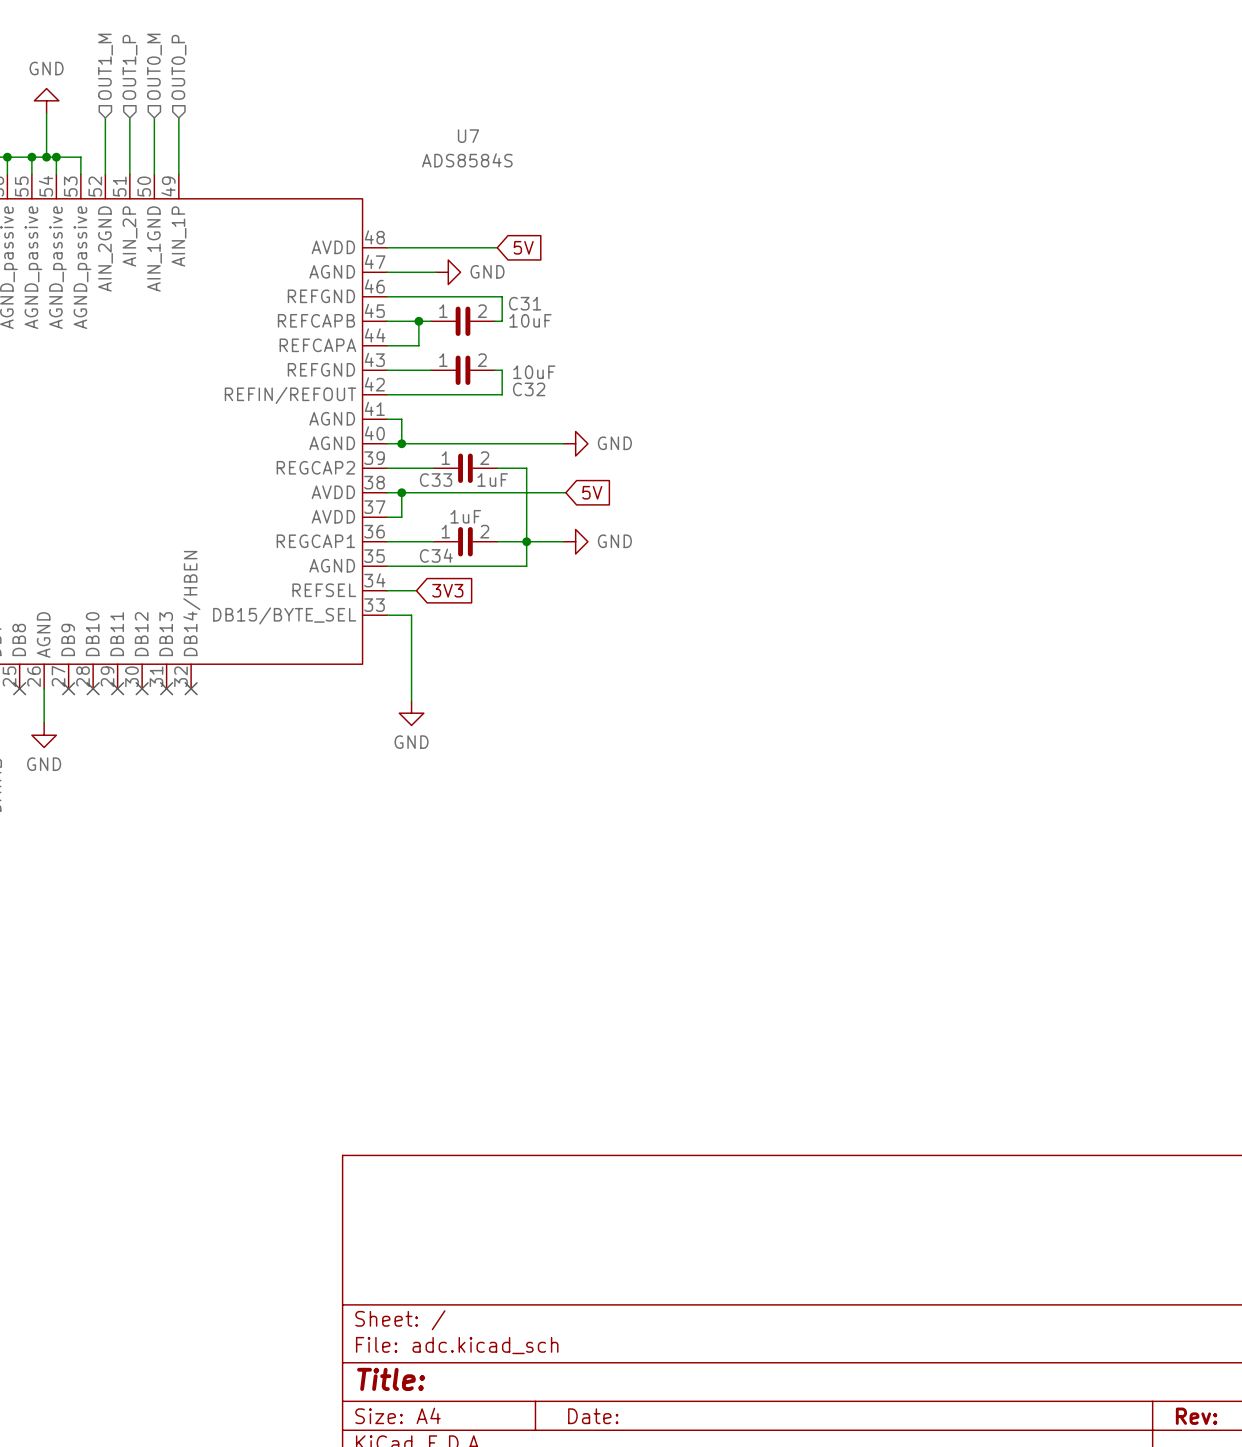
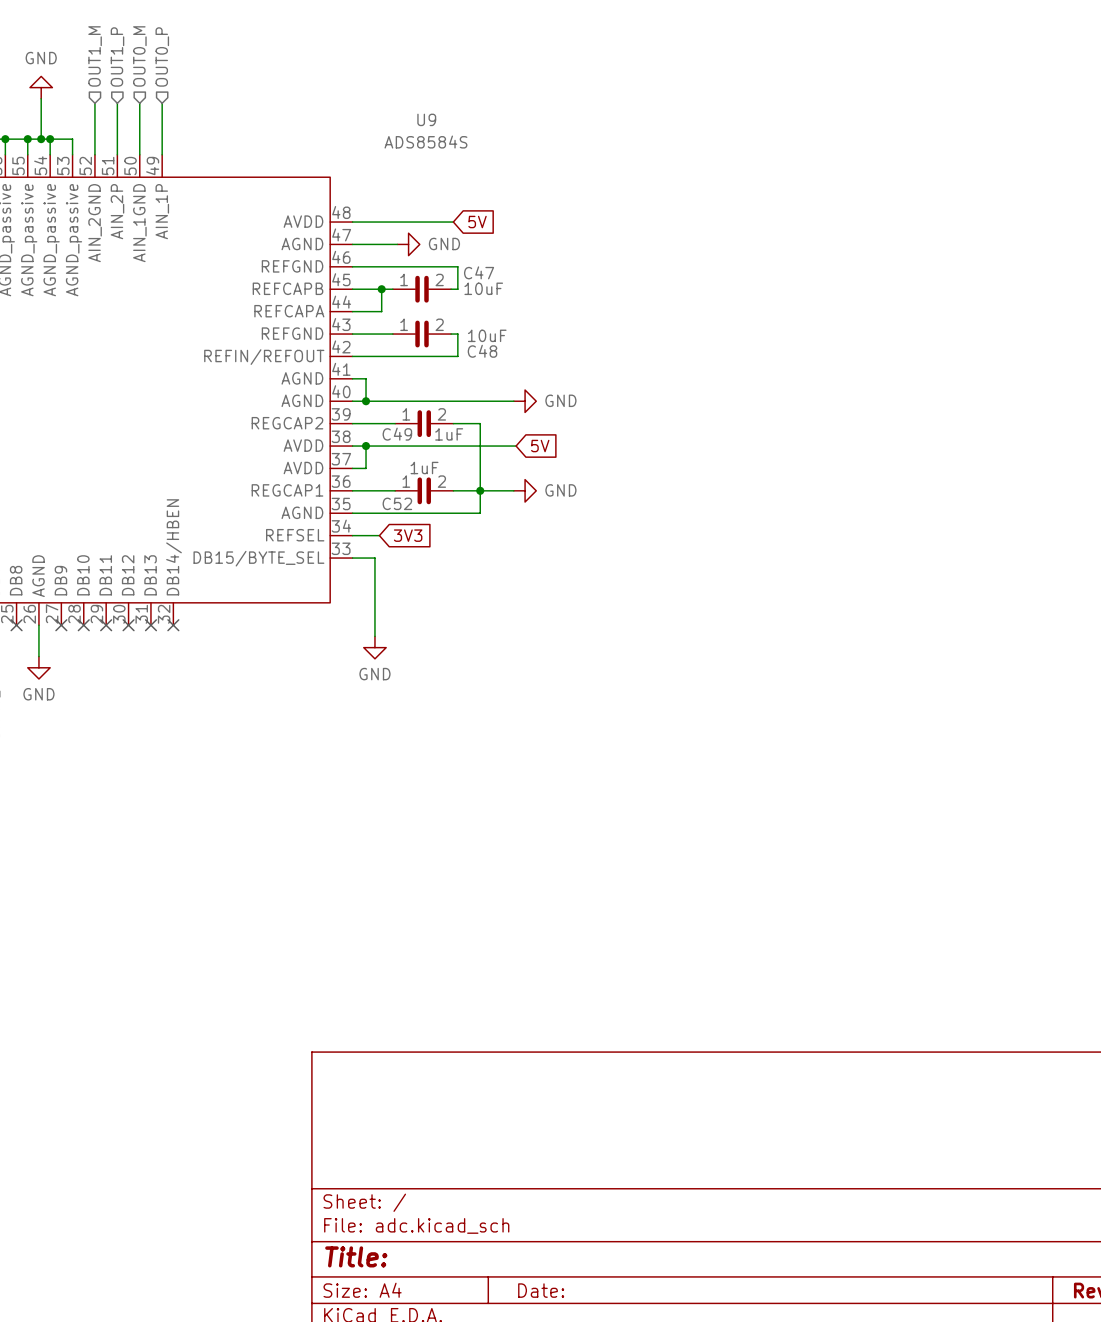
U7 name: U7 (468, 136) -> U9 (426, 119)
C31 name: C31 (525, 303) -> C47 (479, 272)
C32 name: C32 (529, 389) -> C48 (482, 351)
C33 name: C33 (436, 480) -> C49 (397, 434)
C34 name: C34 (436, 555) -> C52 (397, 503)

